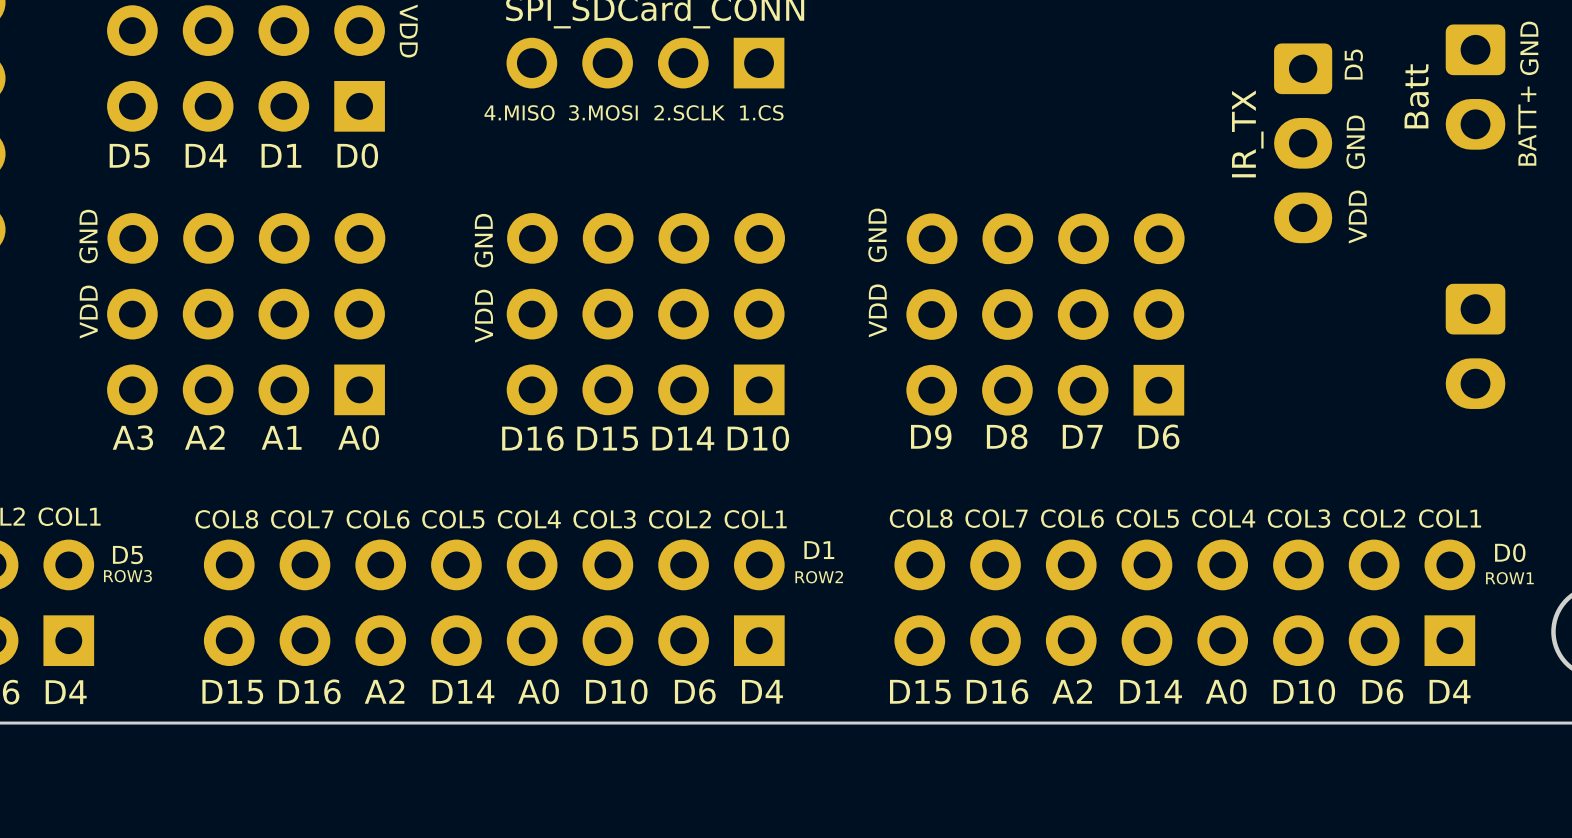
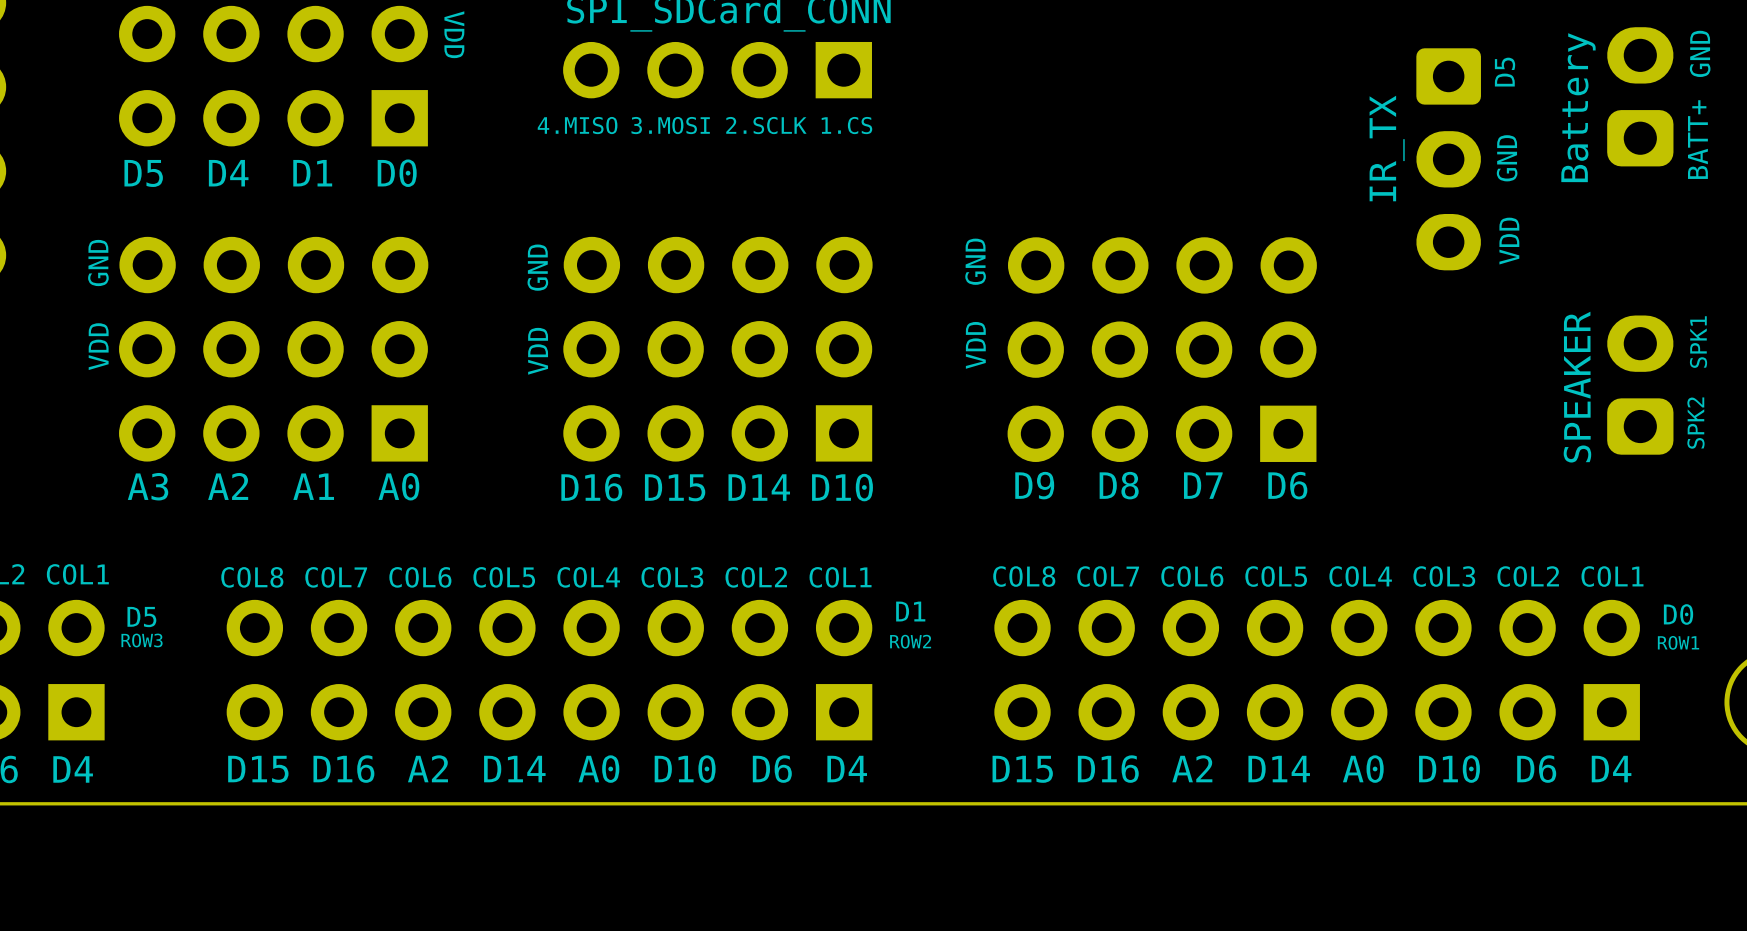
part footprint: [1445, 24, 1506, 150] -> [1607, 27, 1674, 167]
text: Batt (1416, 96) -> Battery (1578, 107)
part footprint: [1445, 283, 1506, 410] -> [1607, 315, 1674, 455]
text: none -> SPK1 (1698, 342)
text: none -> SPEAKER (1577, 387)
text: none -> SPK2 (1695, 423)

